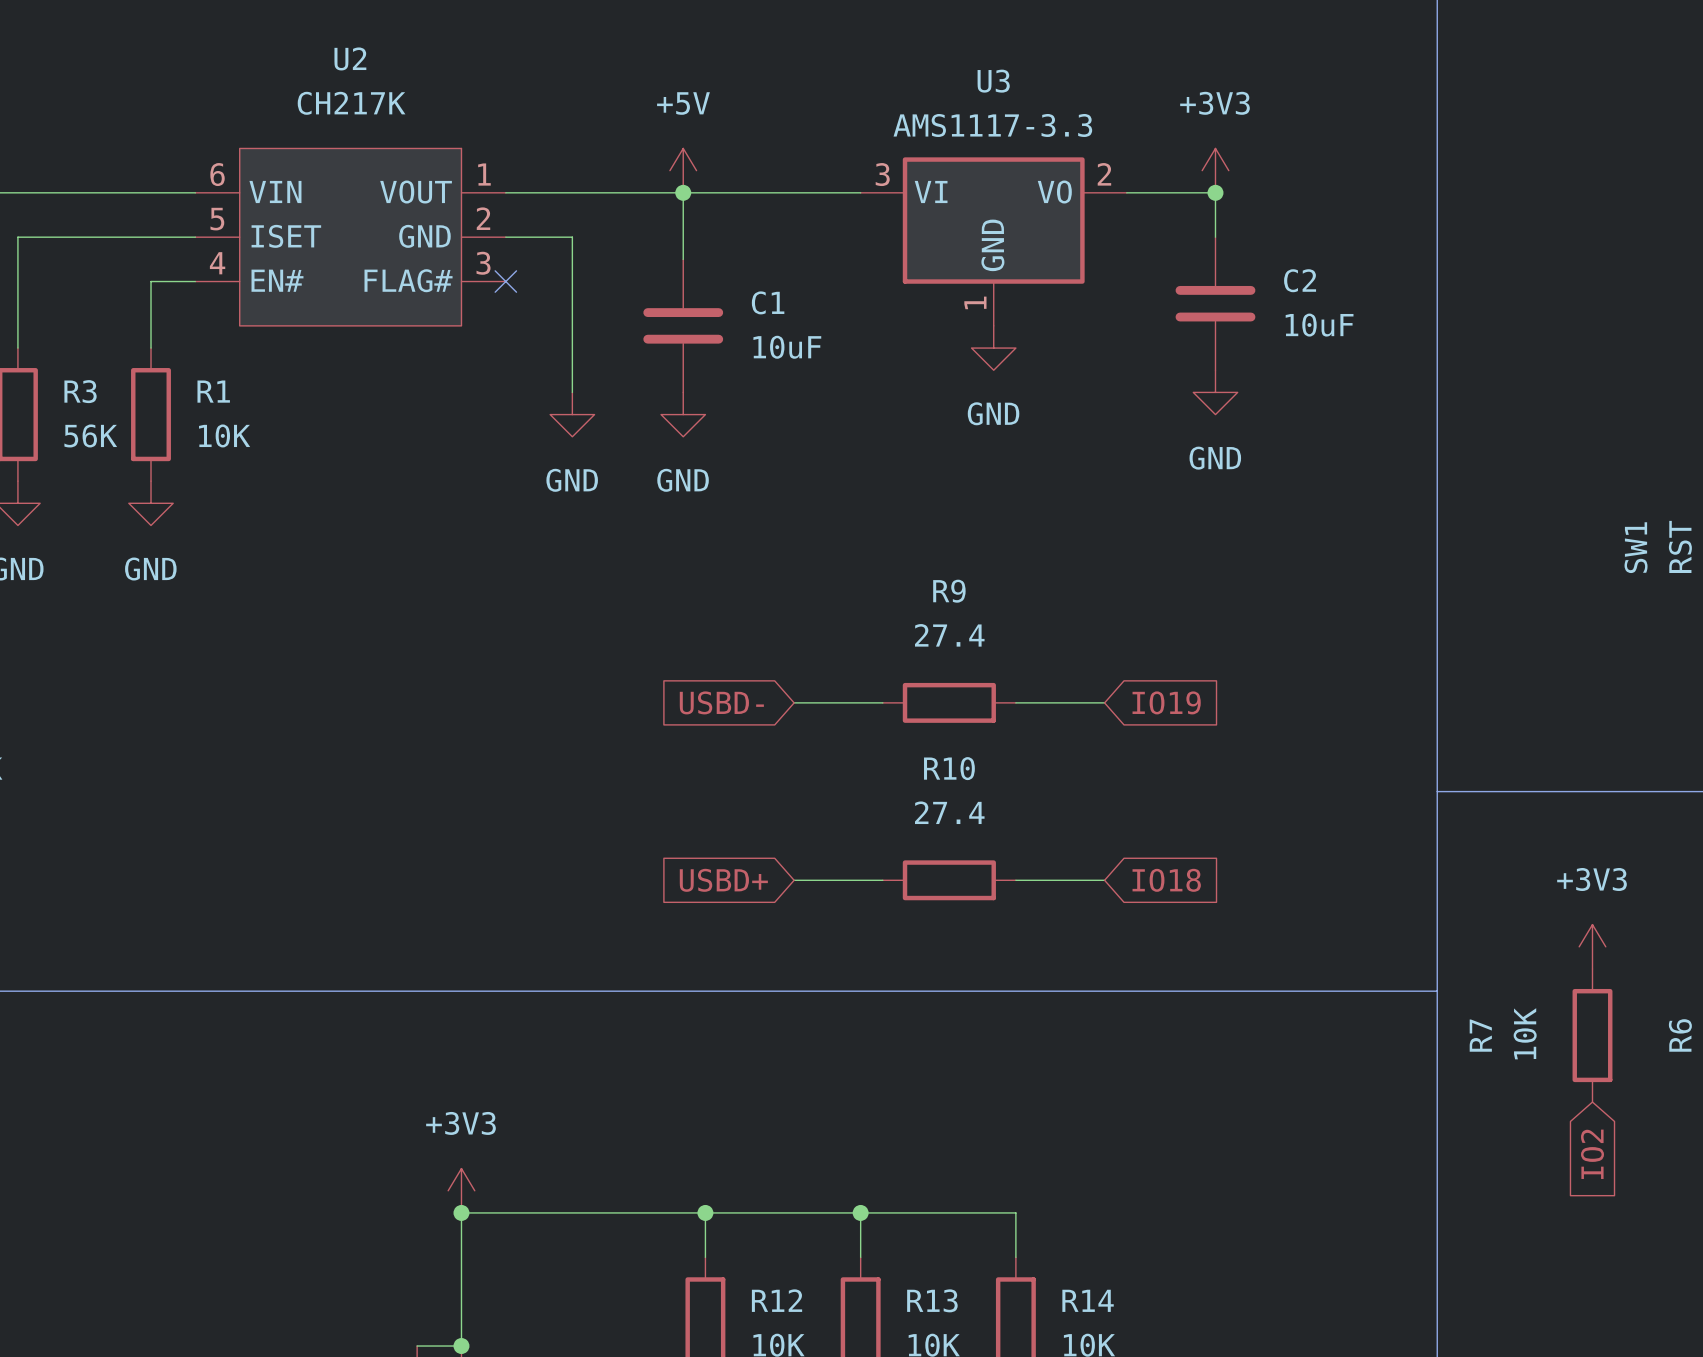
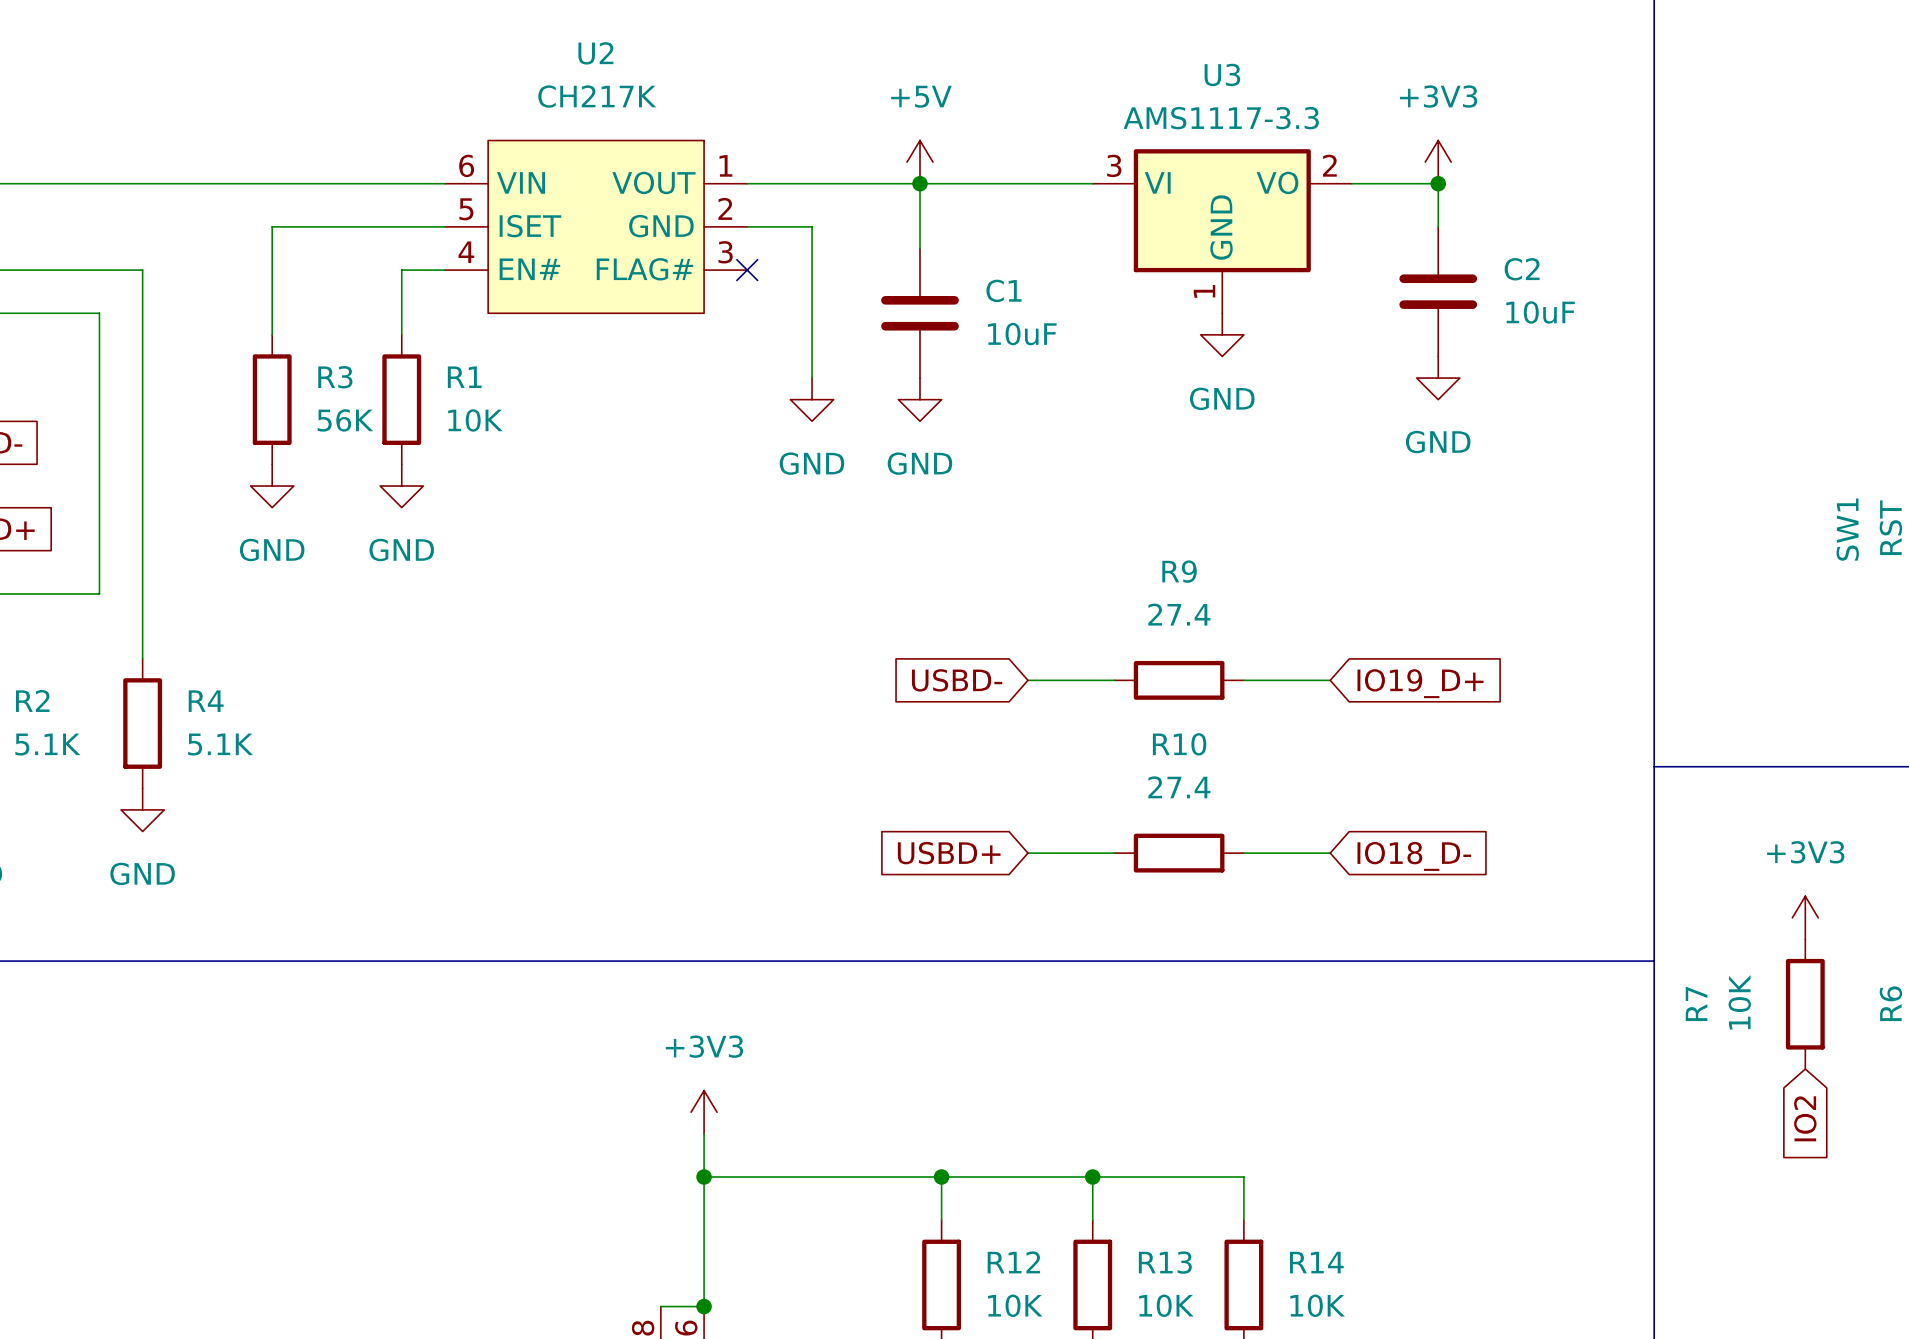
global label: IO19 (1166, 702) -> IO19_D+ (1420, 683)
global label: IO18 (1166, 880) -> IO18_D- (1414, 856)
power symbol position: +3V3 (461, 1190) -> +3V3 (704, 1112)

